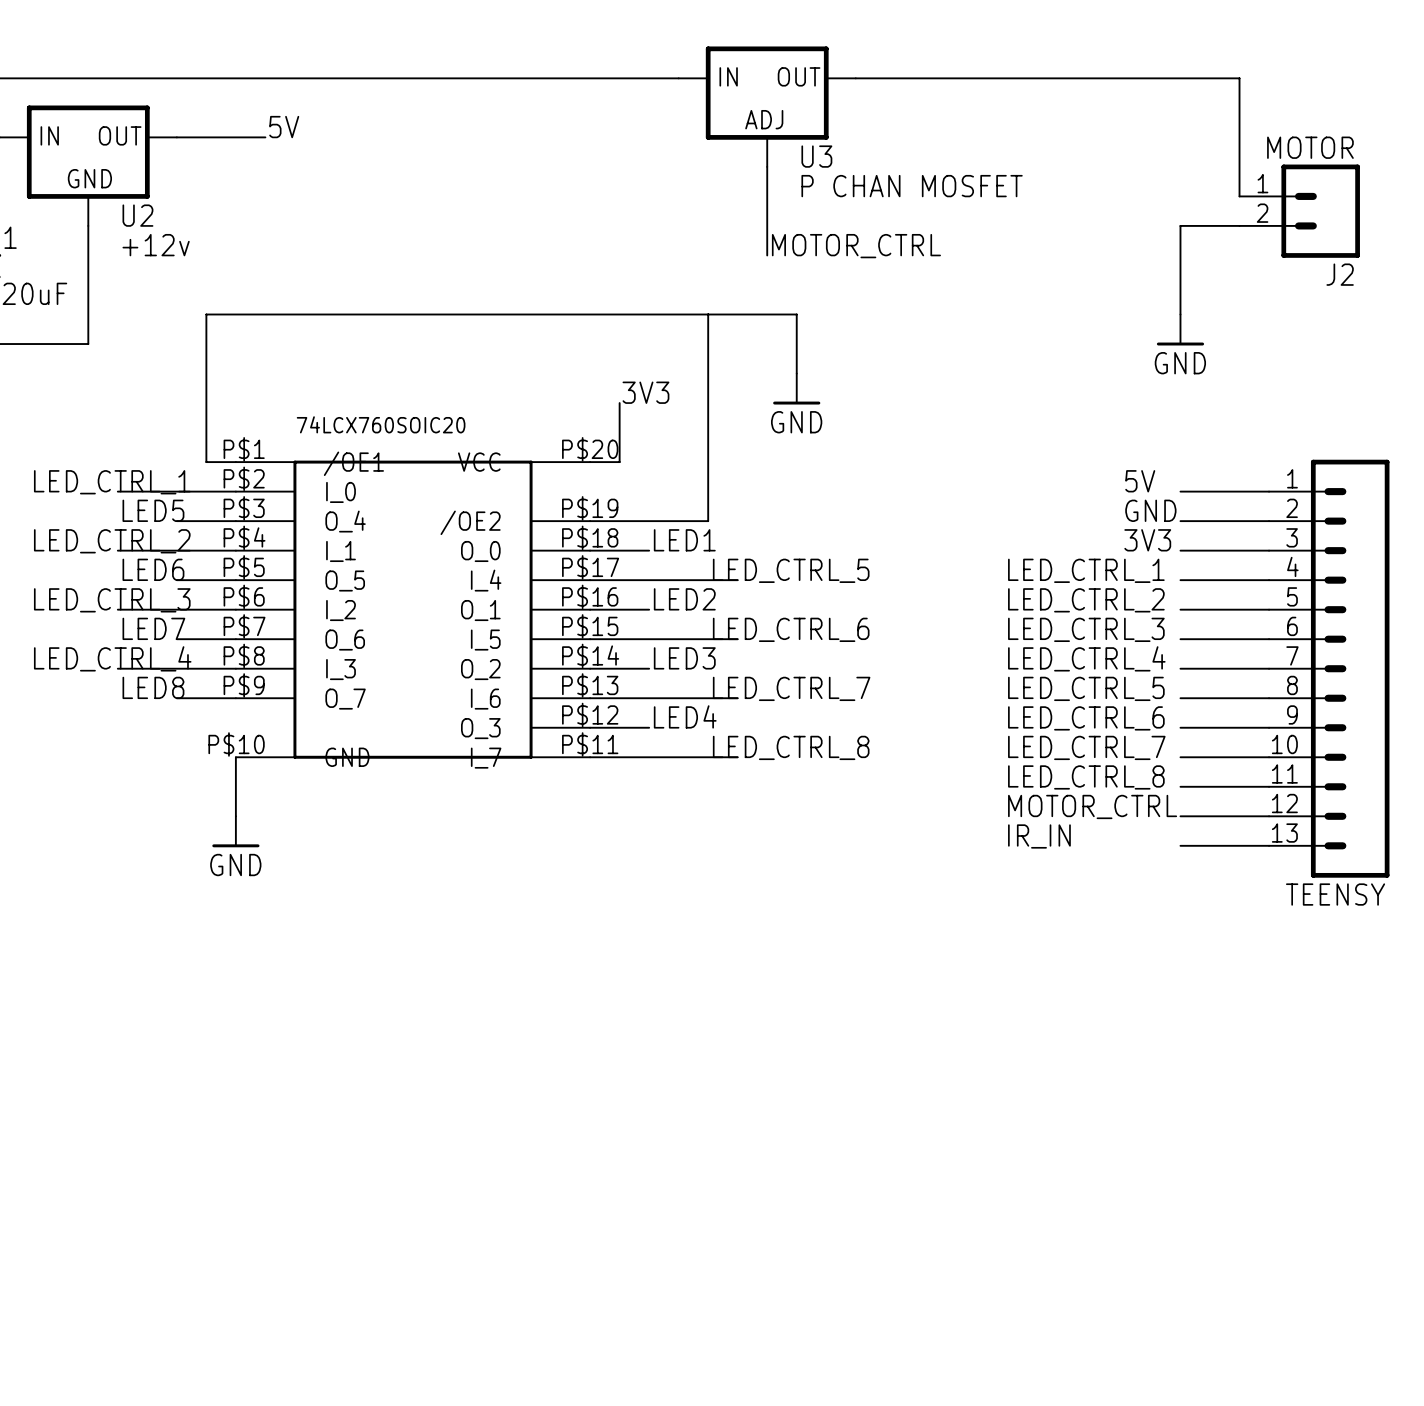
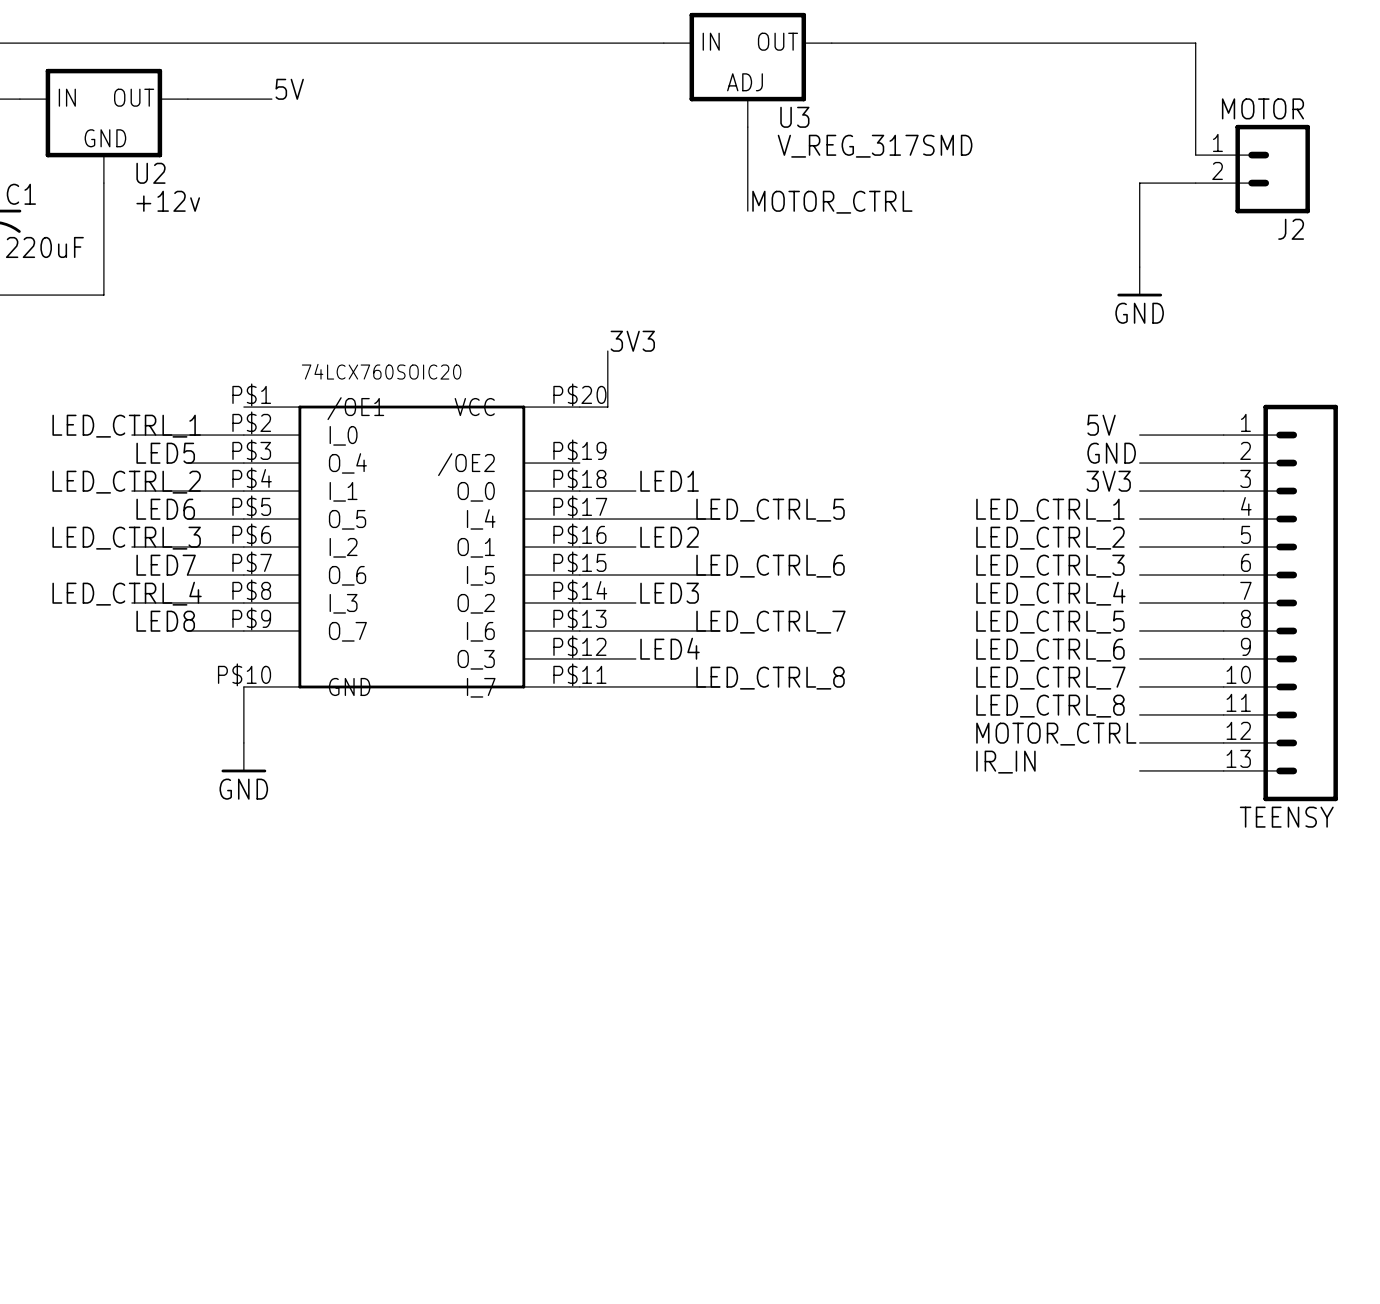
U3 value: P CHAN MOSFET (912, 186) -> V_REG_317SMD (875, 146)
wire: (708, 314) (708, 521) (590, 521) -> none
wire: (796, 373) (796, 314) (206, 314) (206, 462) (235, 462) -> none
power symbol: GND (796, 389) -> none

